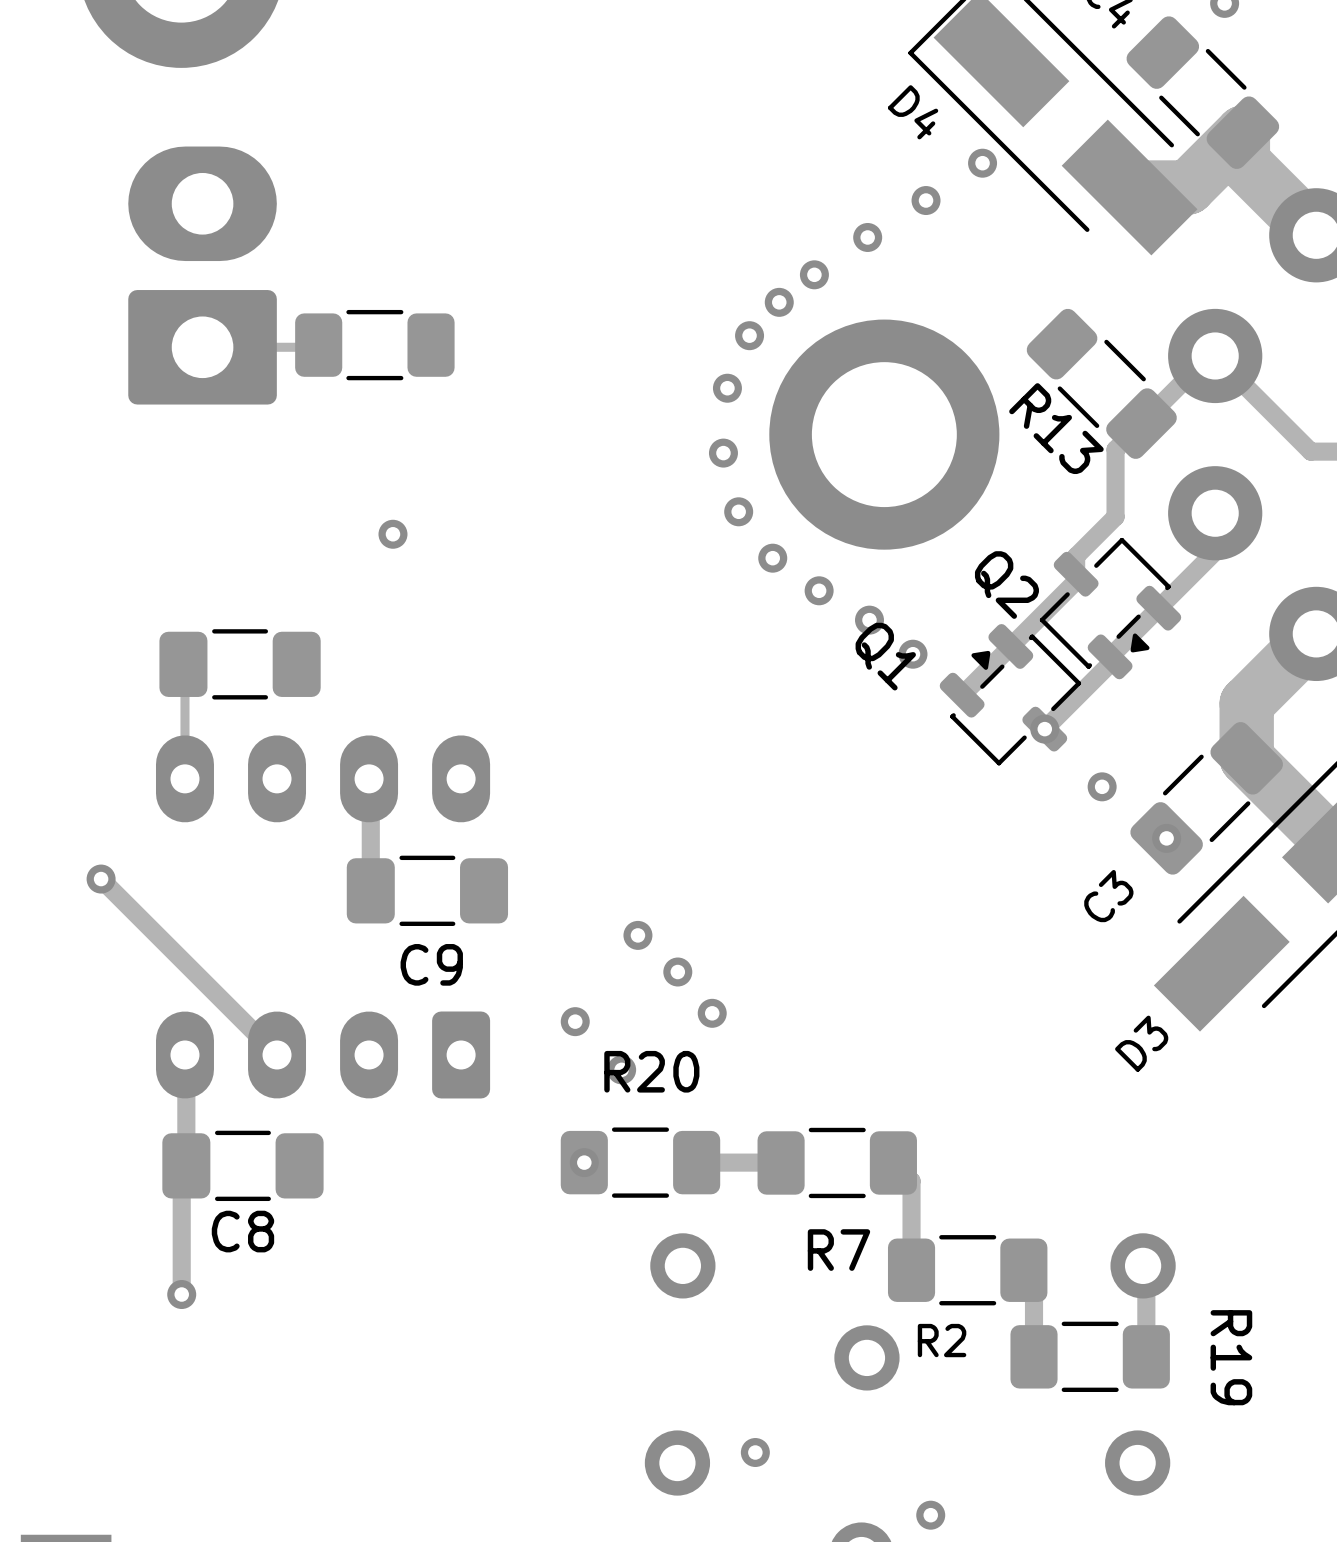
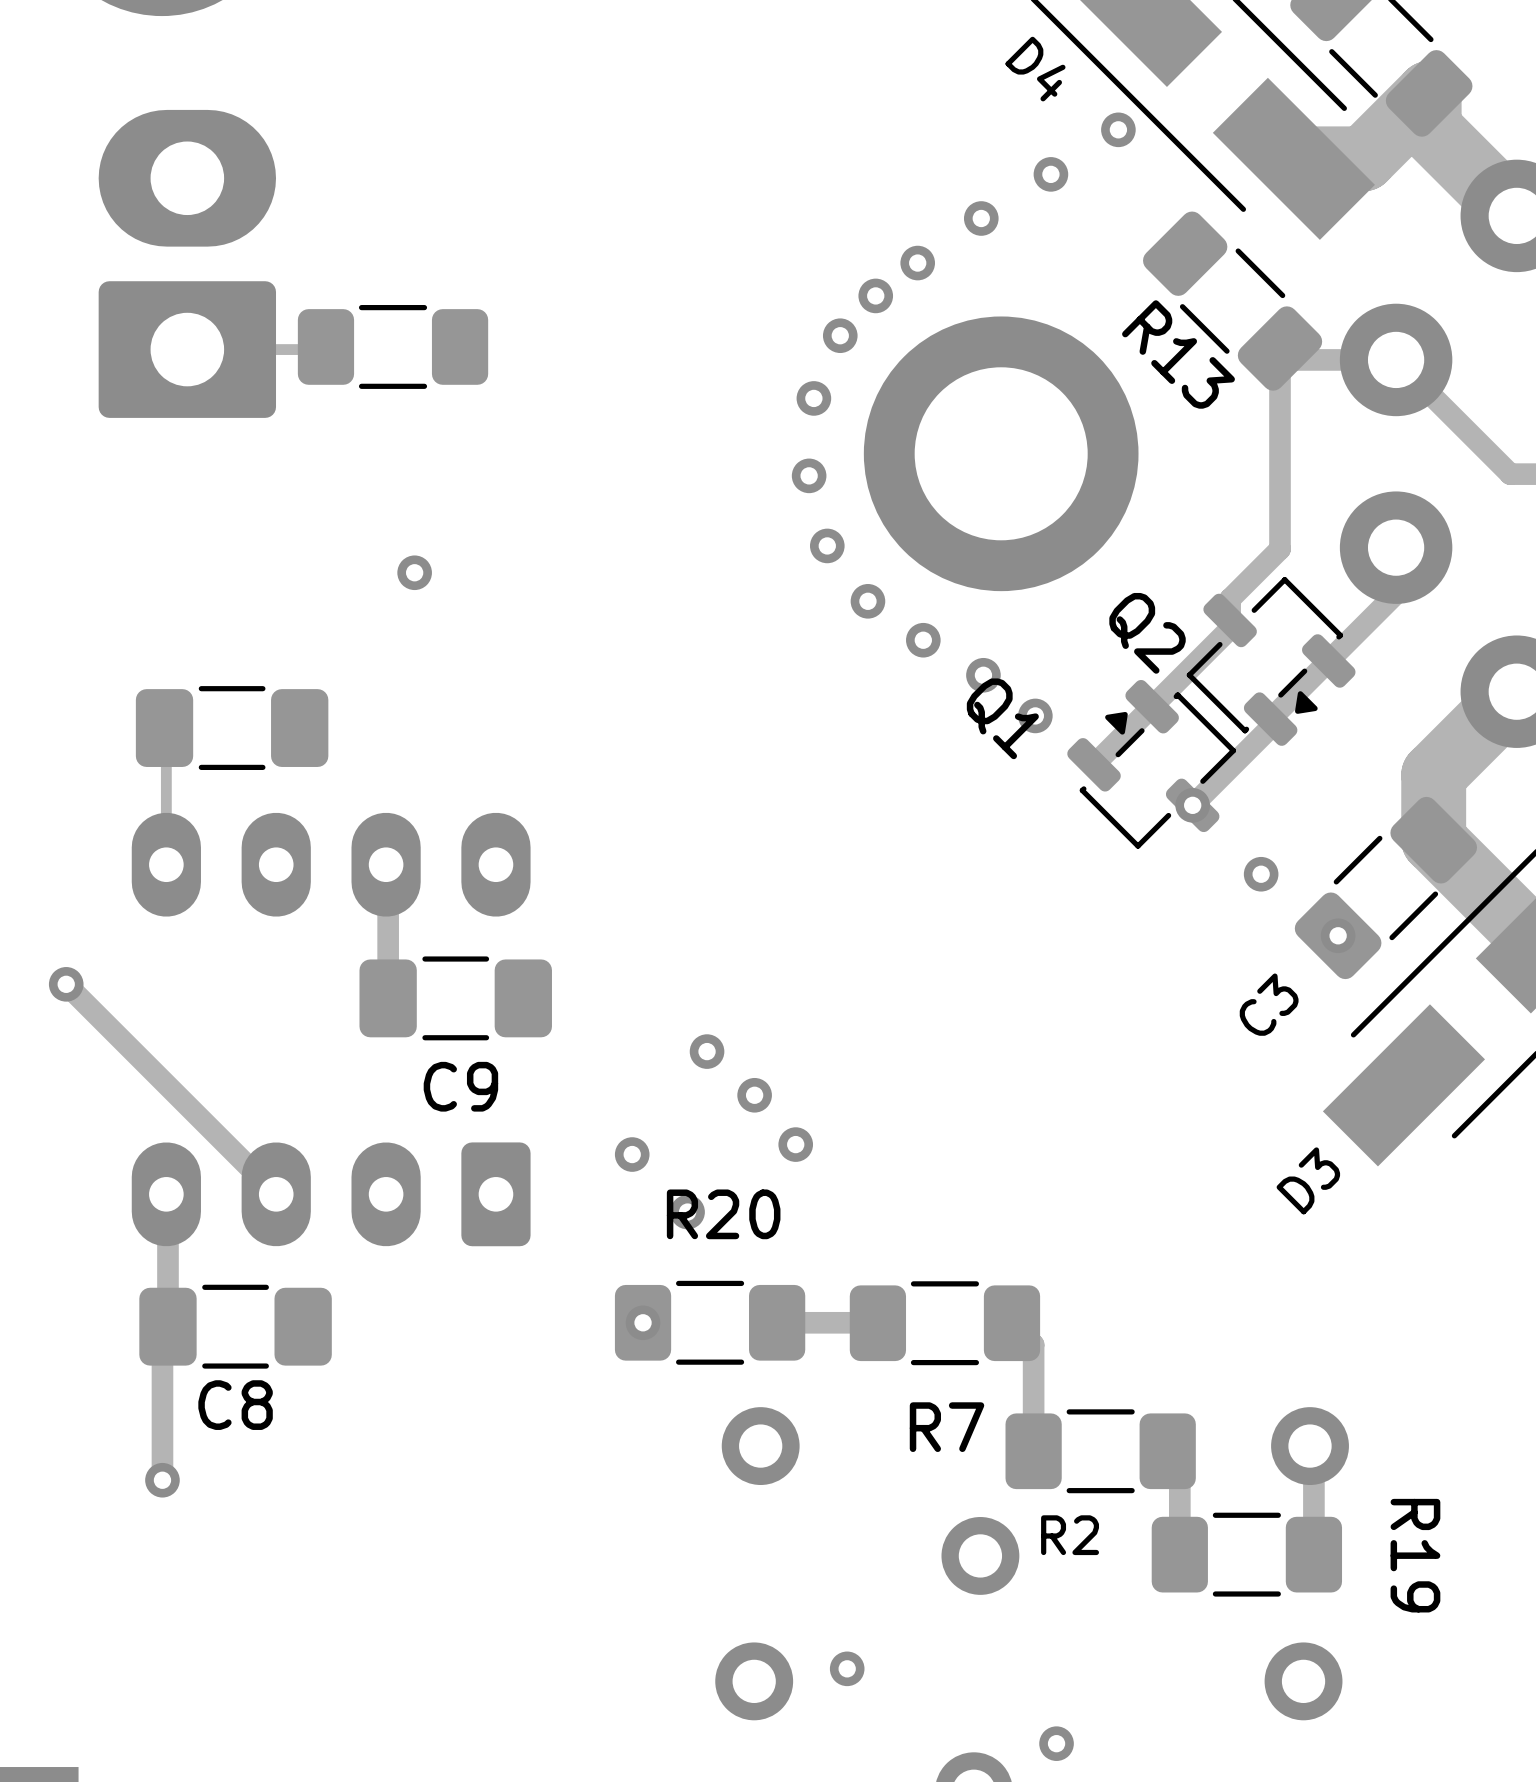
track: (1209, 355) (1115, 449) (1115, 516) -> (1388, 359) (1291, 359) (1280, 348) (1280, 549) (1277, 551)
R13 position: (1101, 383) -> (1232, 301)

